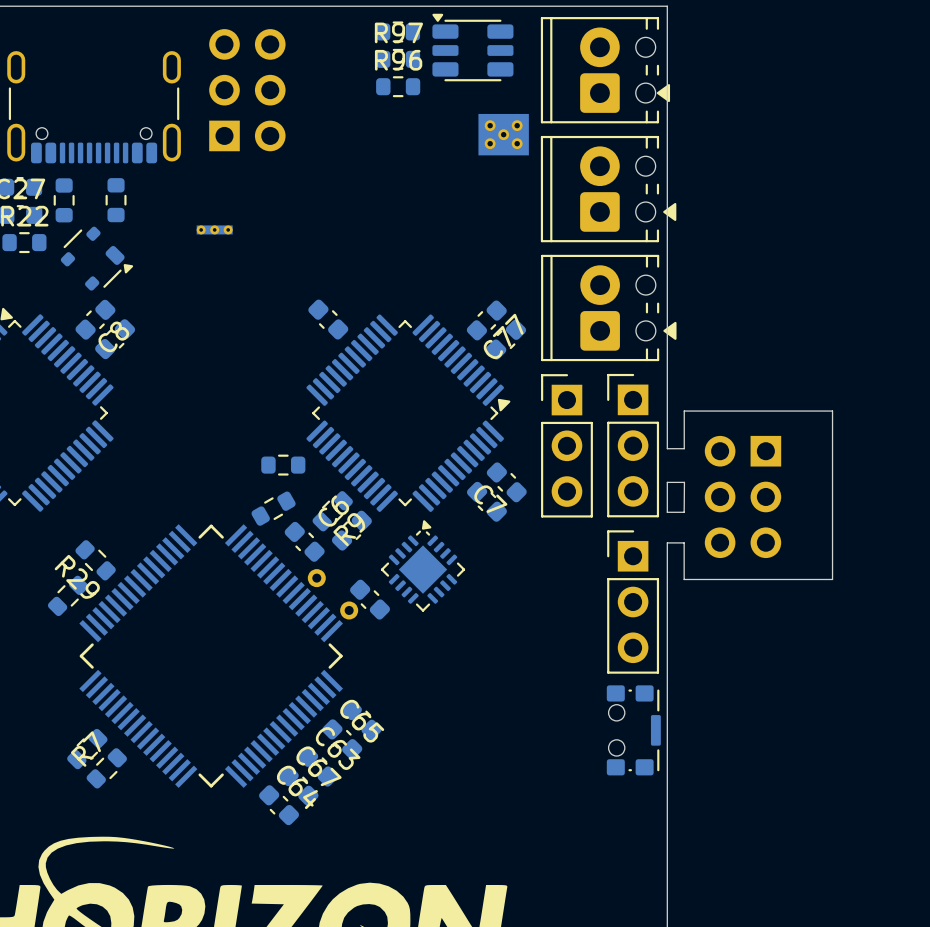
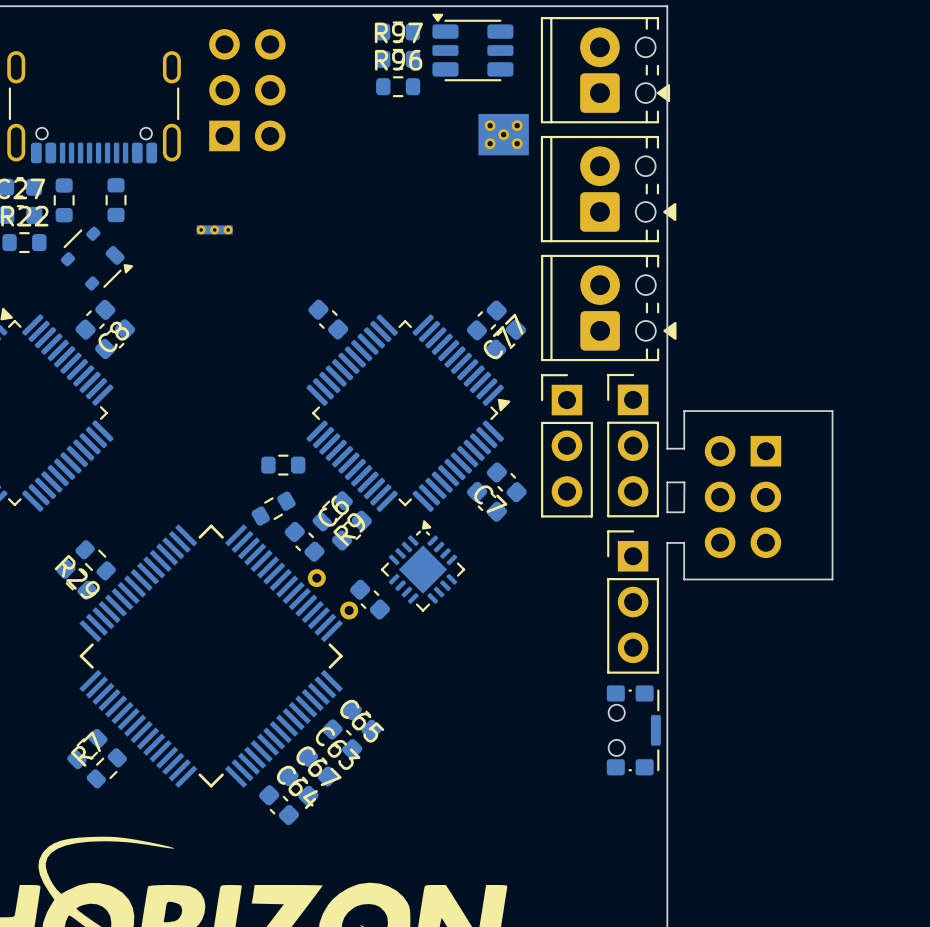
part rotation: 0° (68, 595) -> 90° clockwise (76, 579)

